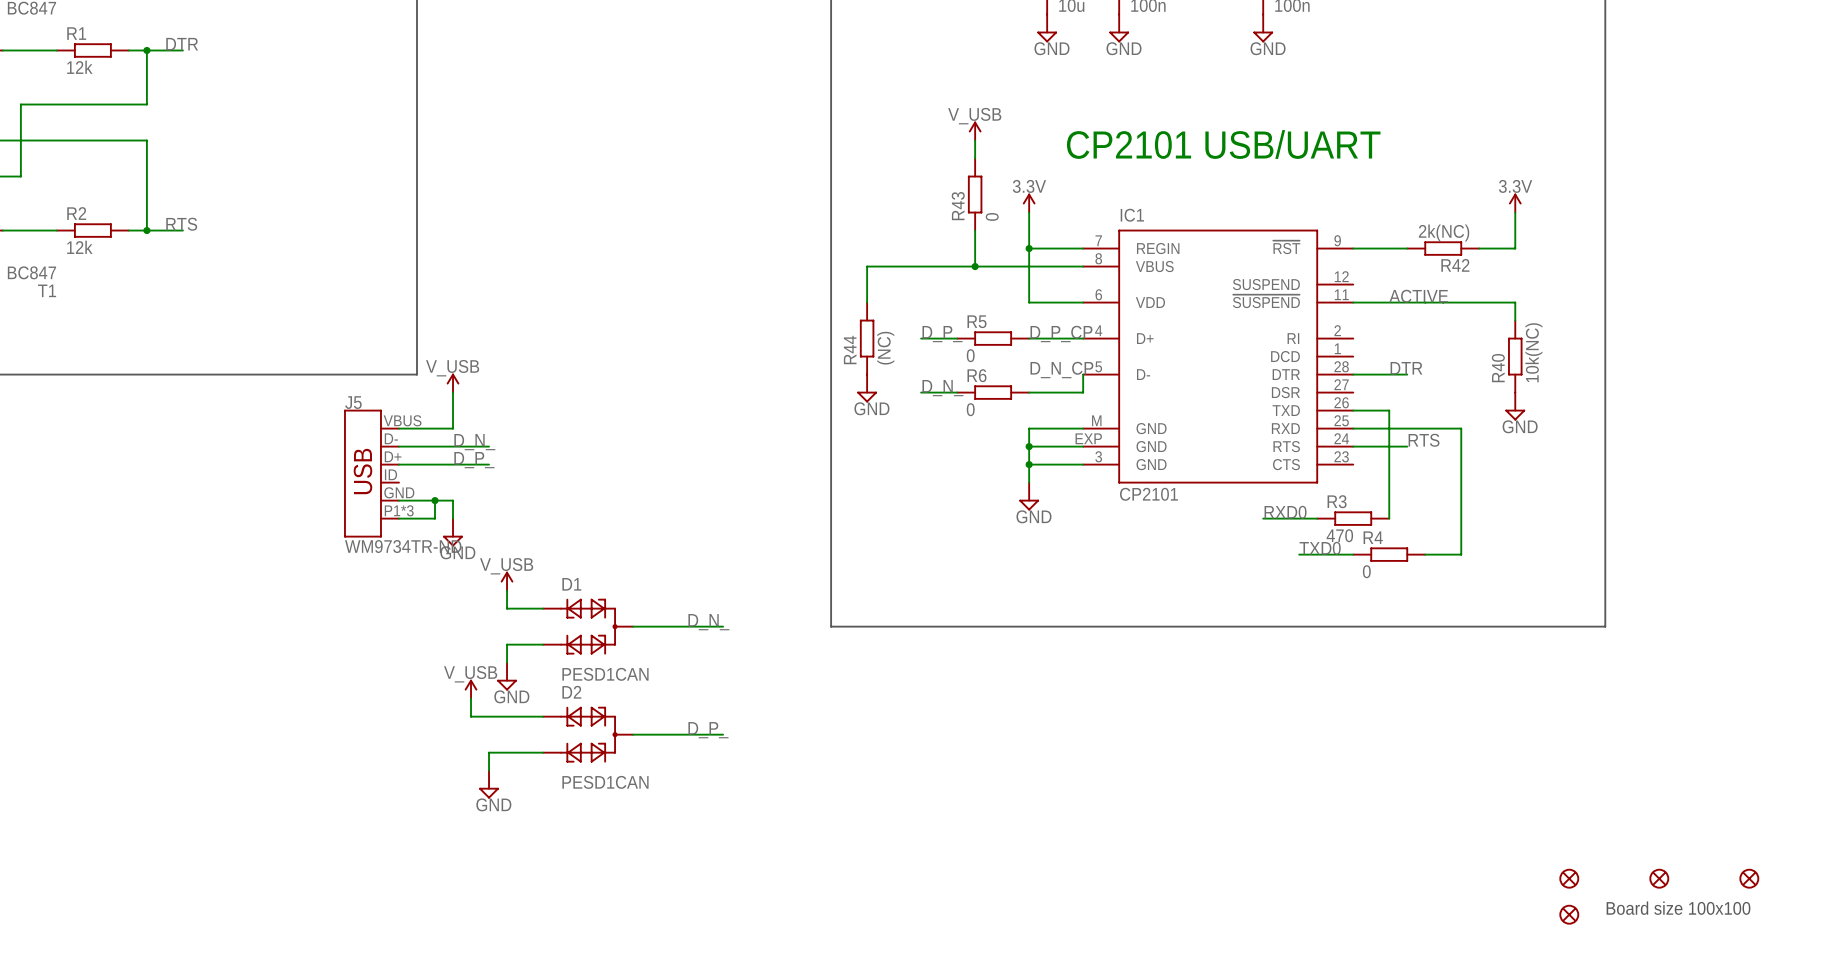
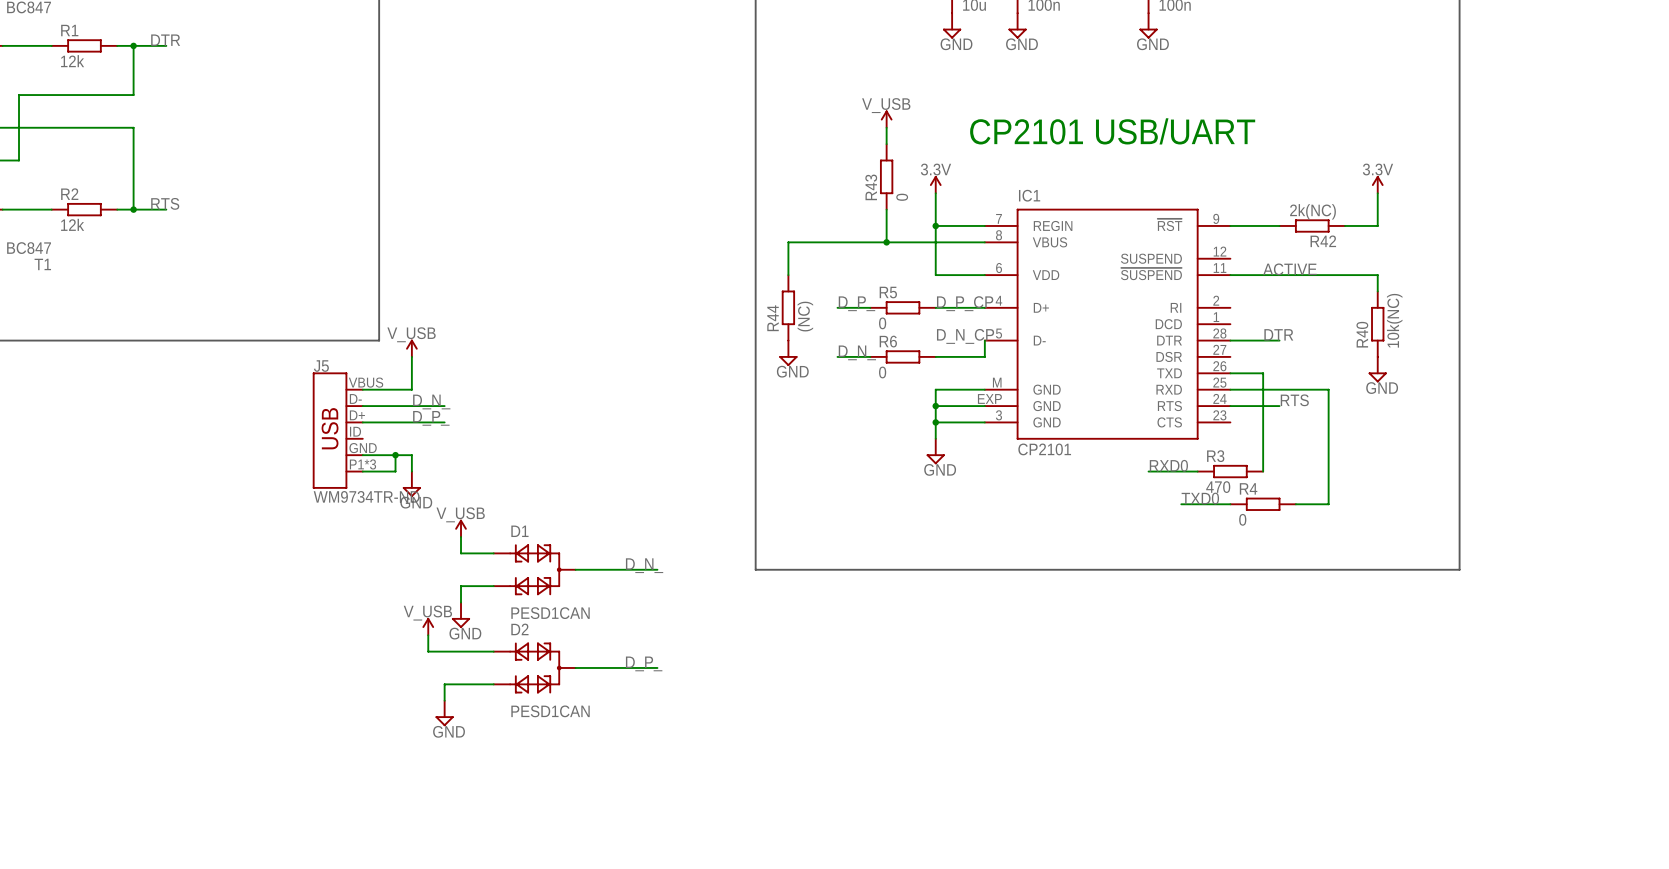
part: (1569, 878) -> none
part: (1659, 878) -> none
part: (1749, 878) -> none
text: Board size 100x100 (1678, 908) -> none
part: (1569, 914) -> none

